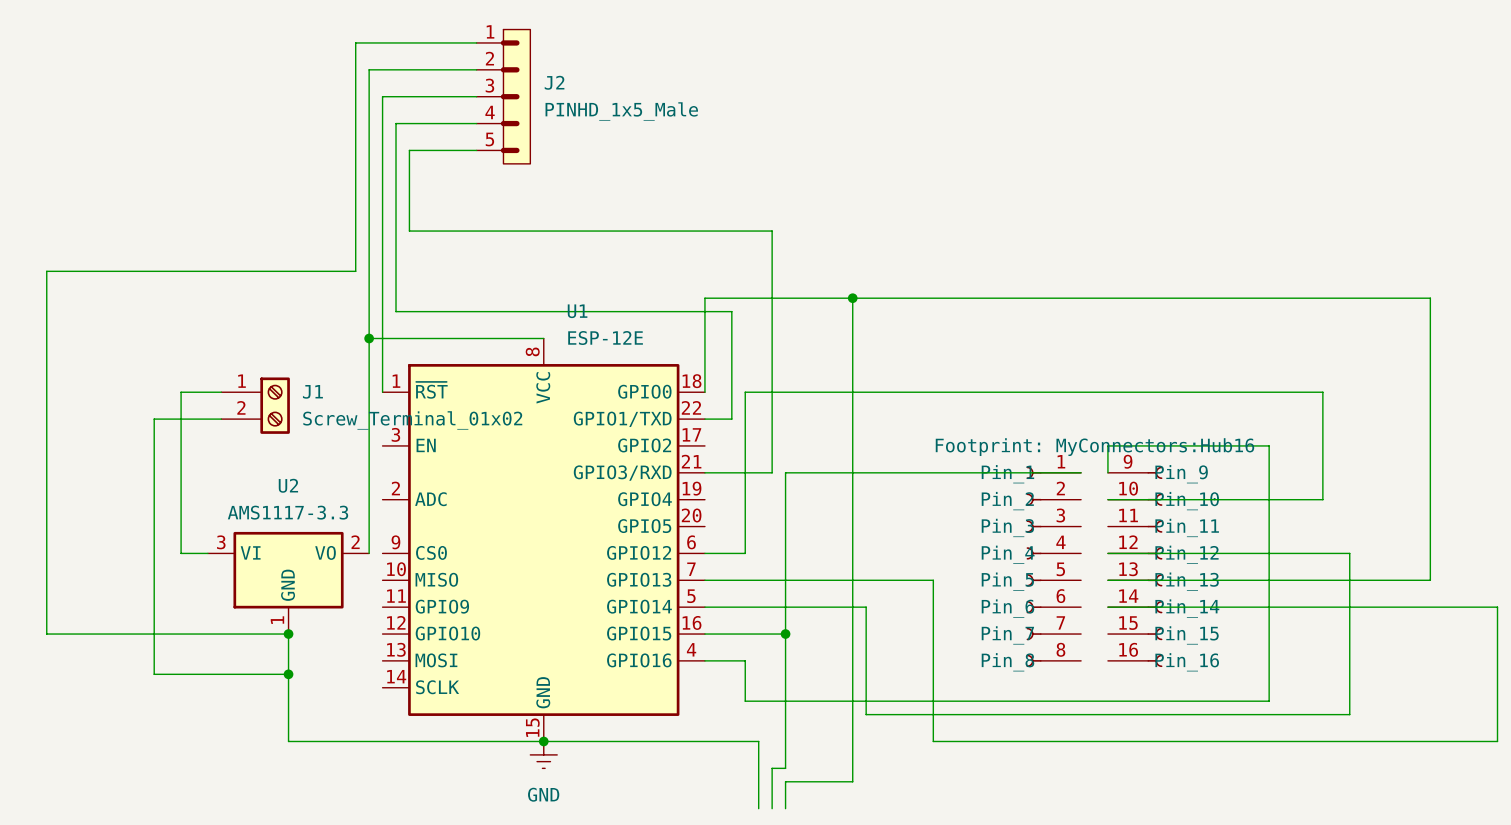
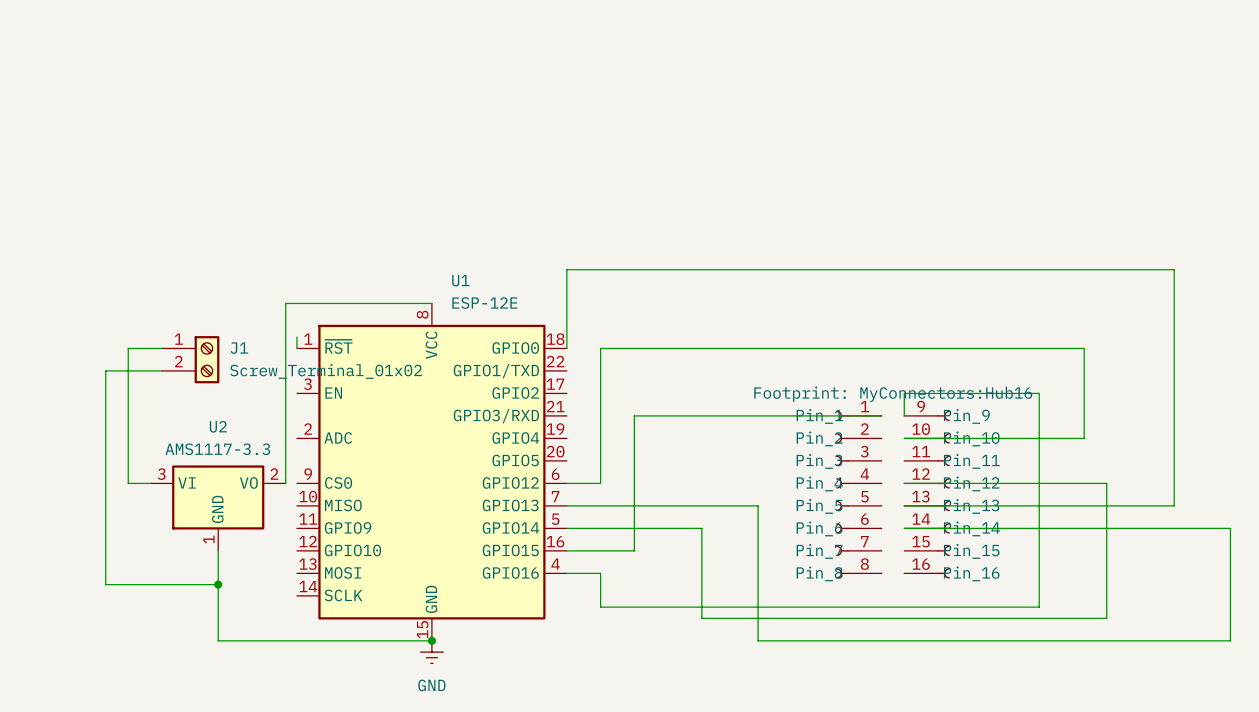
wire: (476, 42) (355, 42) (355, 271) (46, 271) (46, 634) (288, 634) -> none
wire: (476, 69) (369, 69) (369, 338) -> none
wire: (476, 96) (382, 96) (382, 378) -> none
J2: PINHD_1x5_Male (503, 96) -> none
wire: (476, 123) (396, 123) (396, 311) (731, 311) (731, 419) (704, 419) -> none
wire: (476, 150) (409, 150) (409, 231) (772, 231) (772, 472) (704, 472) -> none
wire: (852, 298) (852, 781) (785, 781) (785, 808) -> none
junction: (852, 298) -> none
junction: (369, 338) -> none
junction: (288, 634) -> none
wire: (785, 634) (785, 768) (772, 768) (772, 808) -> none
junction: (785, 634) -> none
wire: (543, 741) (758, 741) (758, 808) -> none

